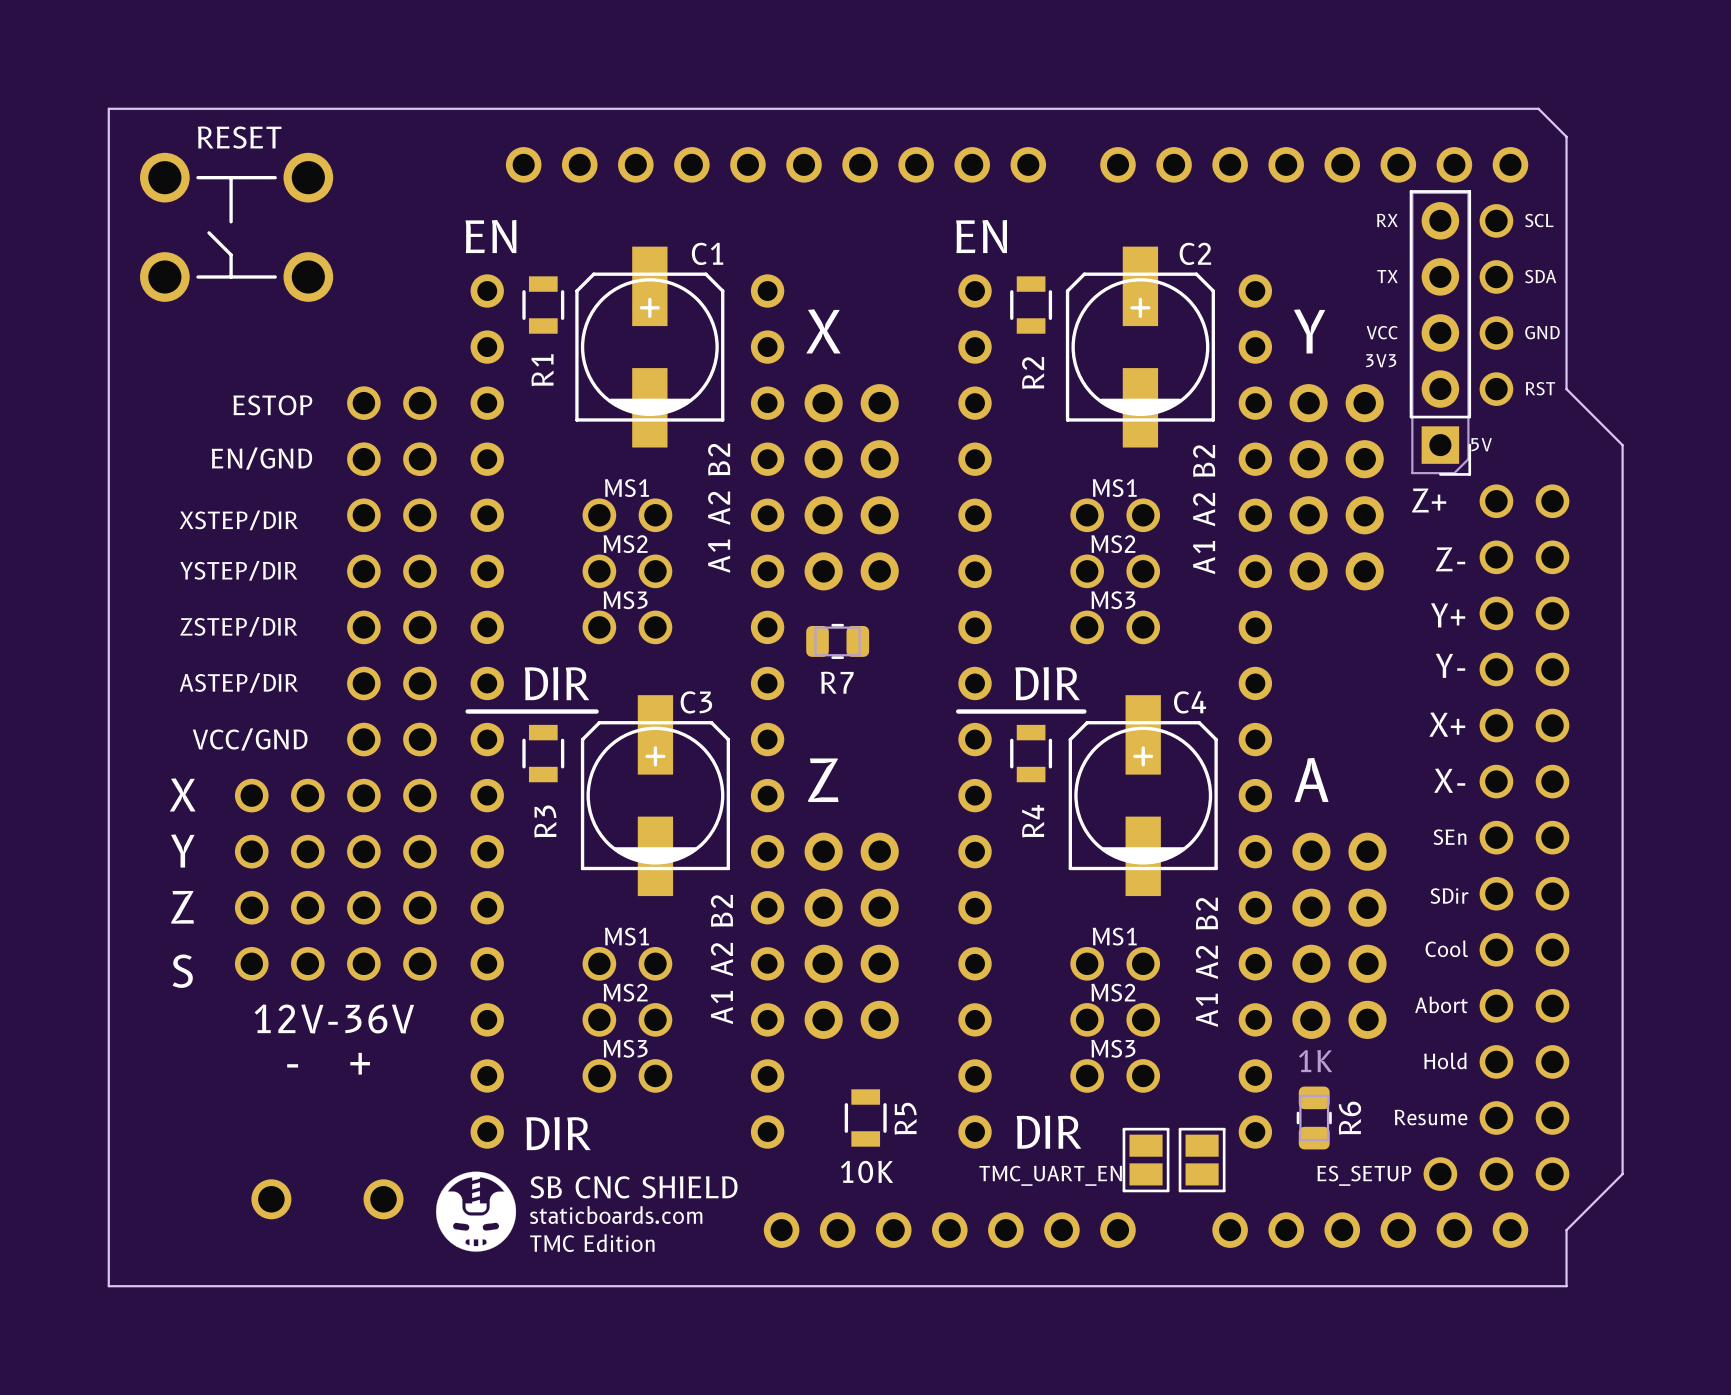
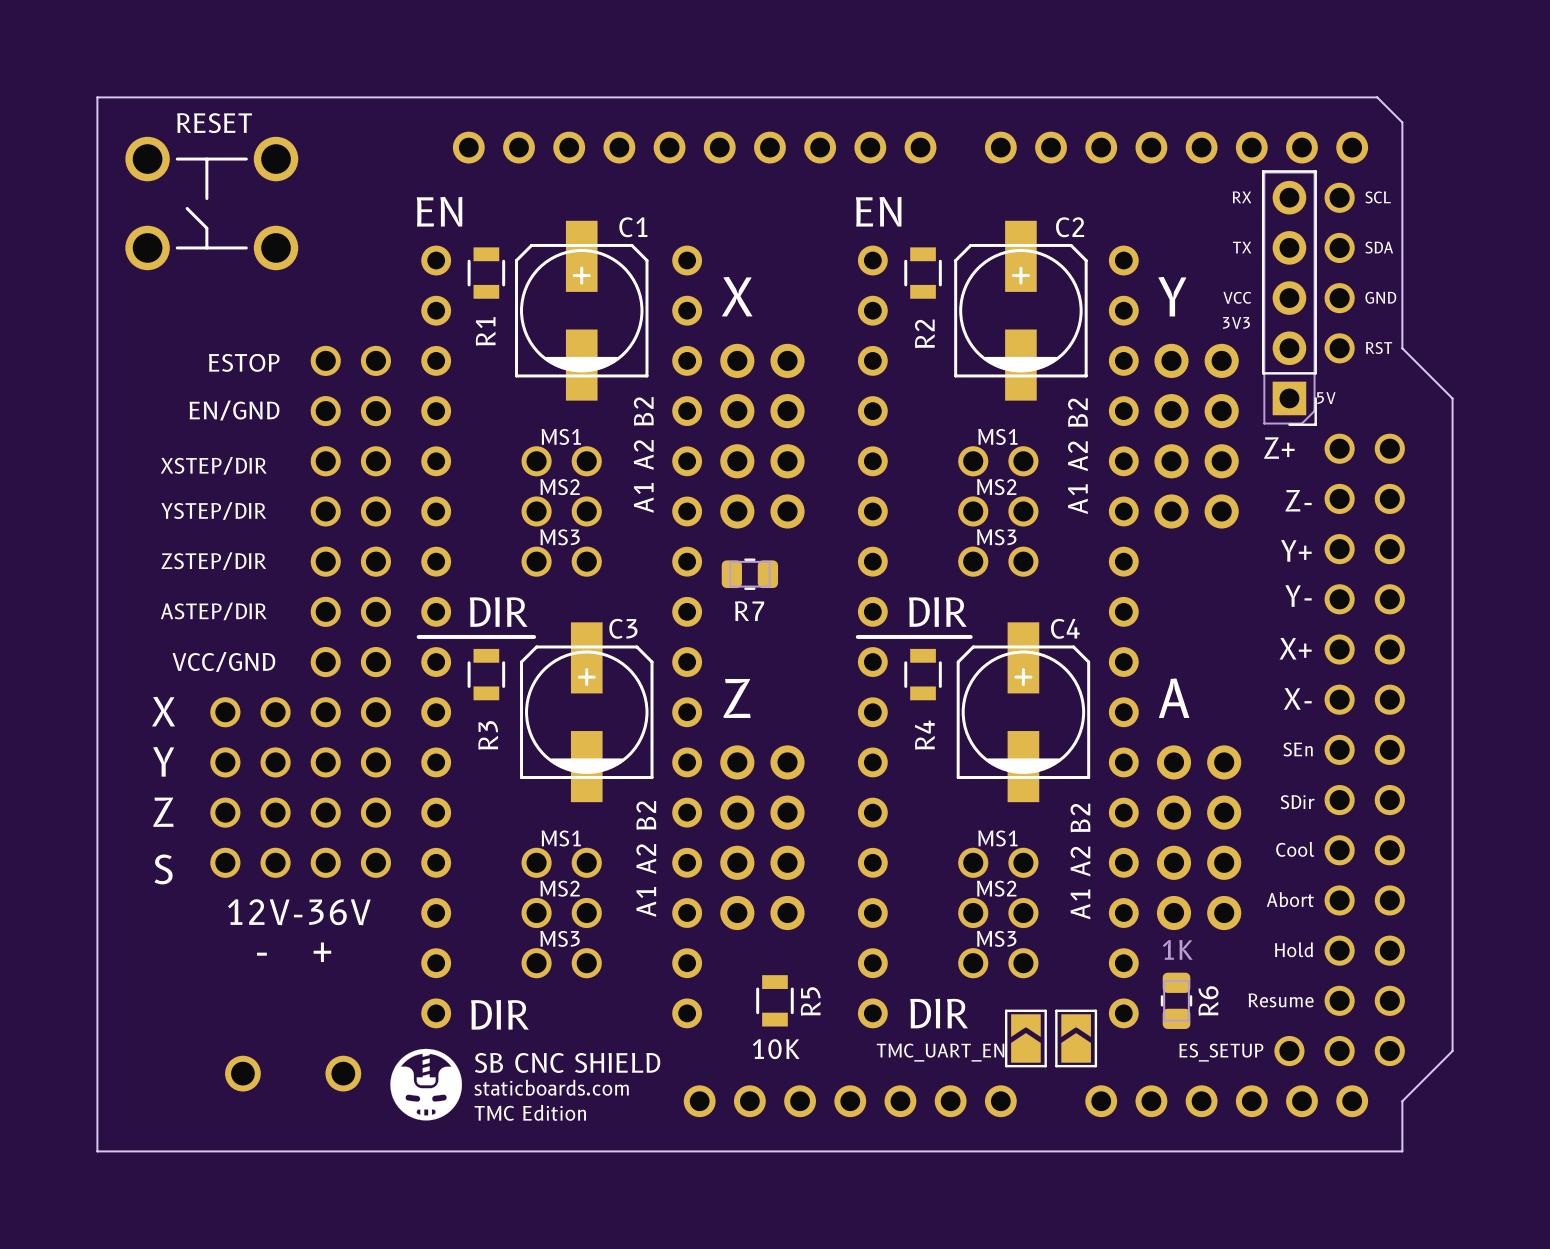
part footprint: [1122, 1127, 1170, 1193] -> [1004, 1009, 1047, 1068]
part footprint: [1178, 1127, 1226, 1193] -> [1055, 1009, 1098, 1068]

